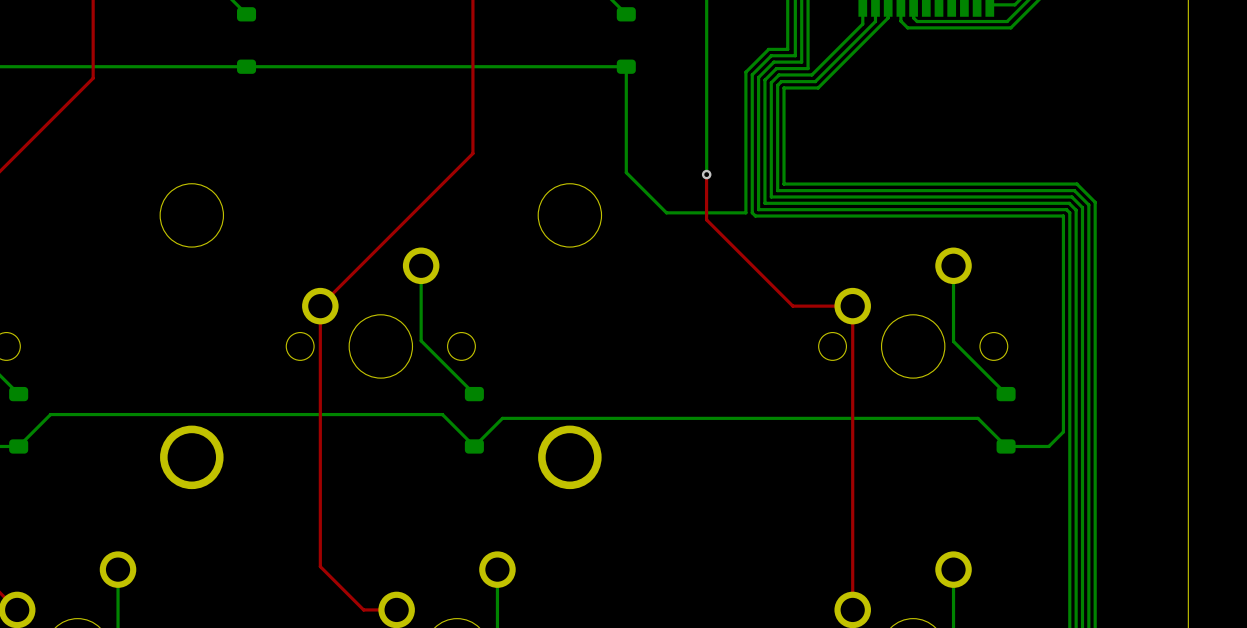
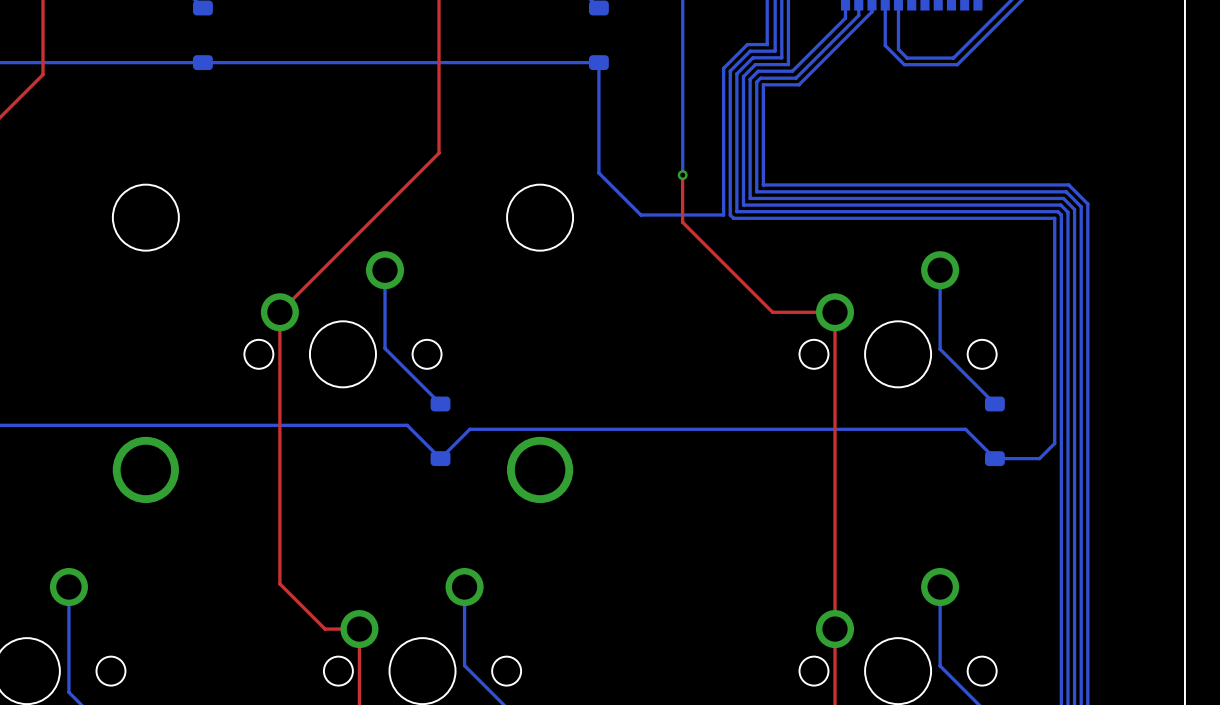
bottom track: (913, 17) (917, 21) (1007, 21) -> (898, 11) (898, 49) (907, 58) (953, 58) (996, 15)
bottom track: (900, 21) (907, 27) (1010, 27) -> (885, 15) (885, 45) (904, 64) (957, 64) (999, 22)

